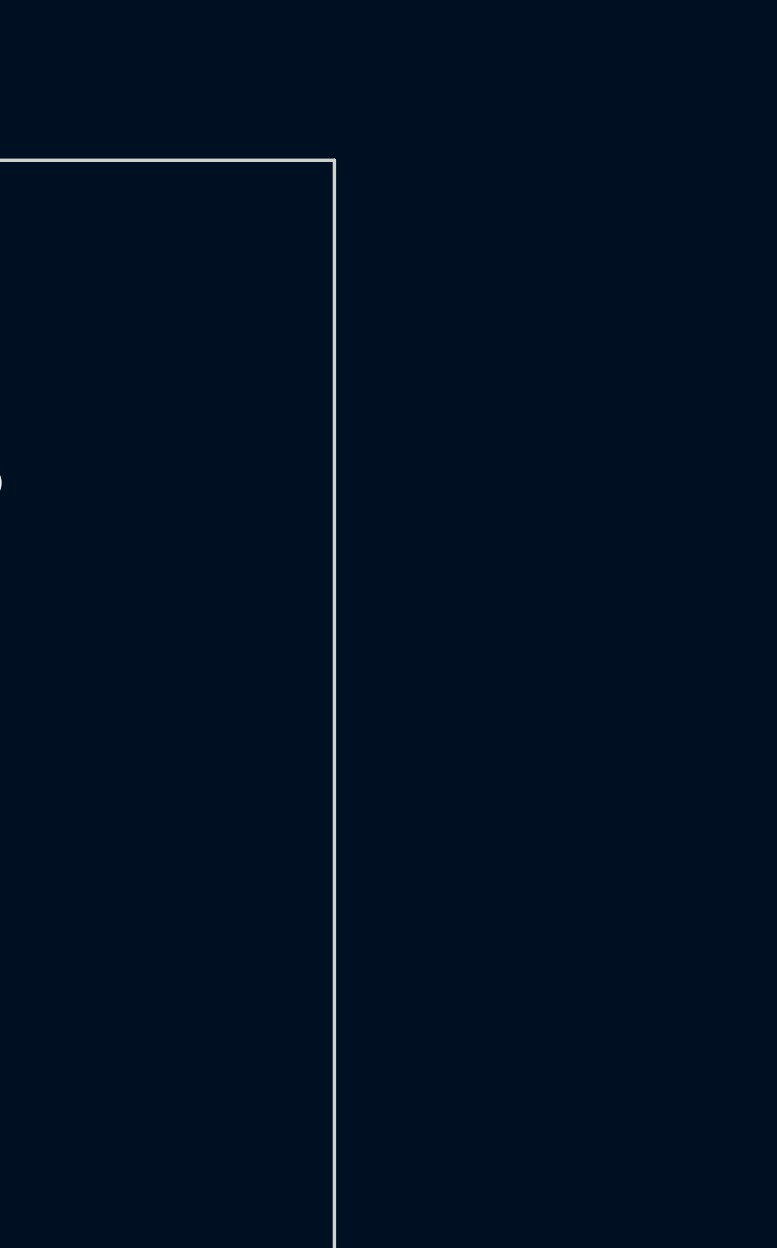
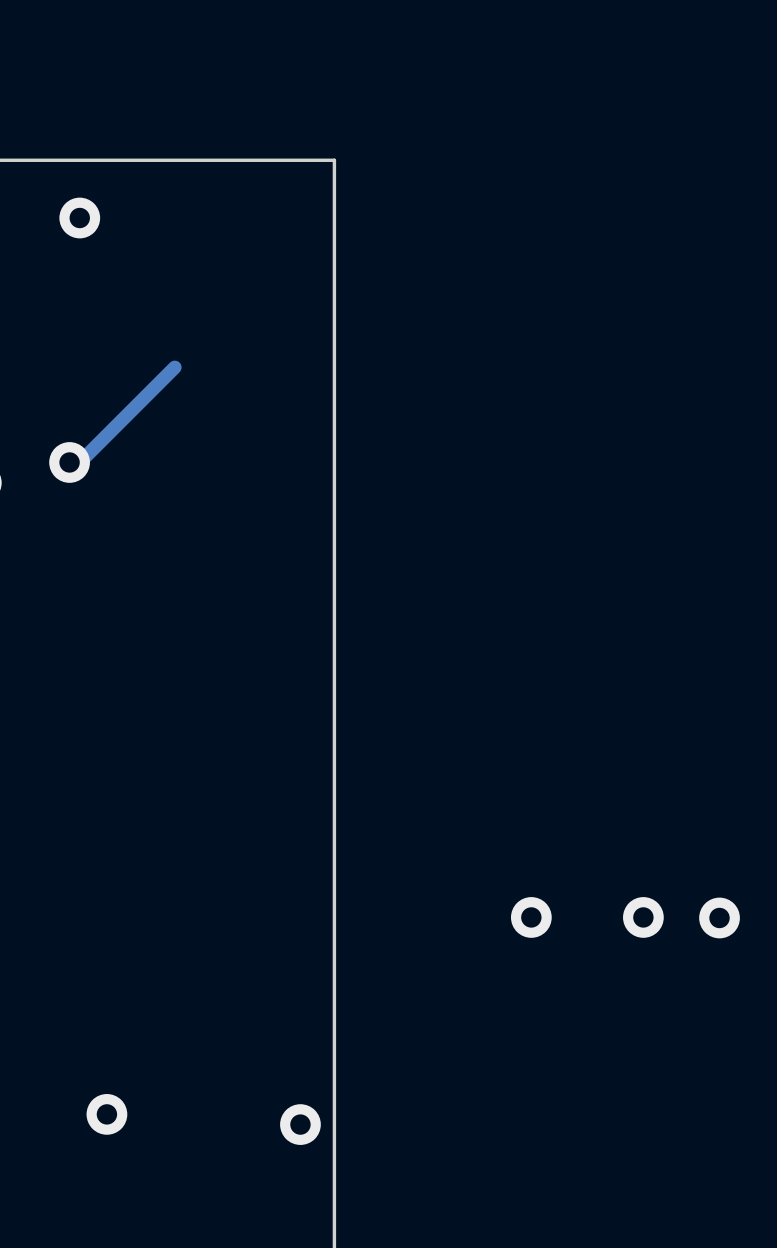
via: none -> (79, 218)
track: none -> (174, 367) (79, 462) (69, 462)
via: none -> (69, 462)
via: none -> (531, 917)
via: none -> (643, 917)
via: none -> (719, 917)
via: none -> (106, 1114)
via: none -> (300, 1124)

